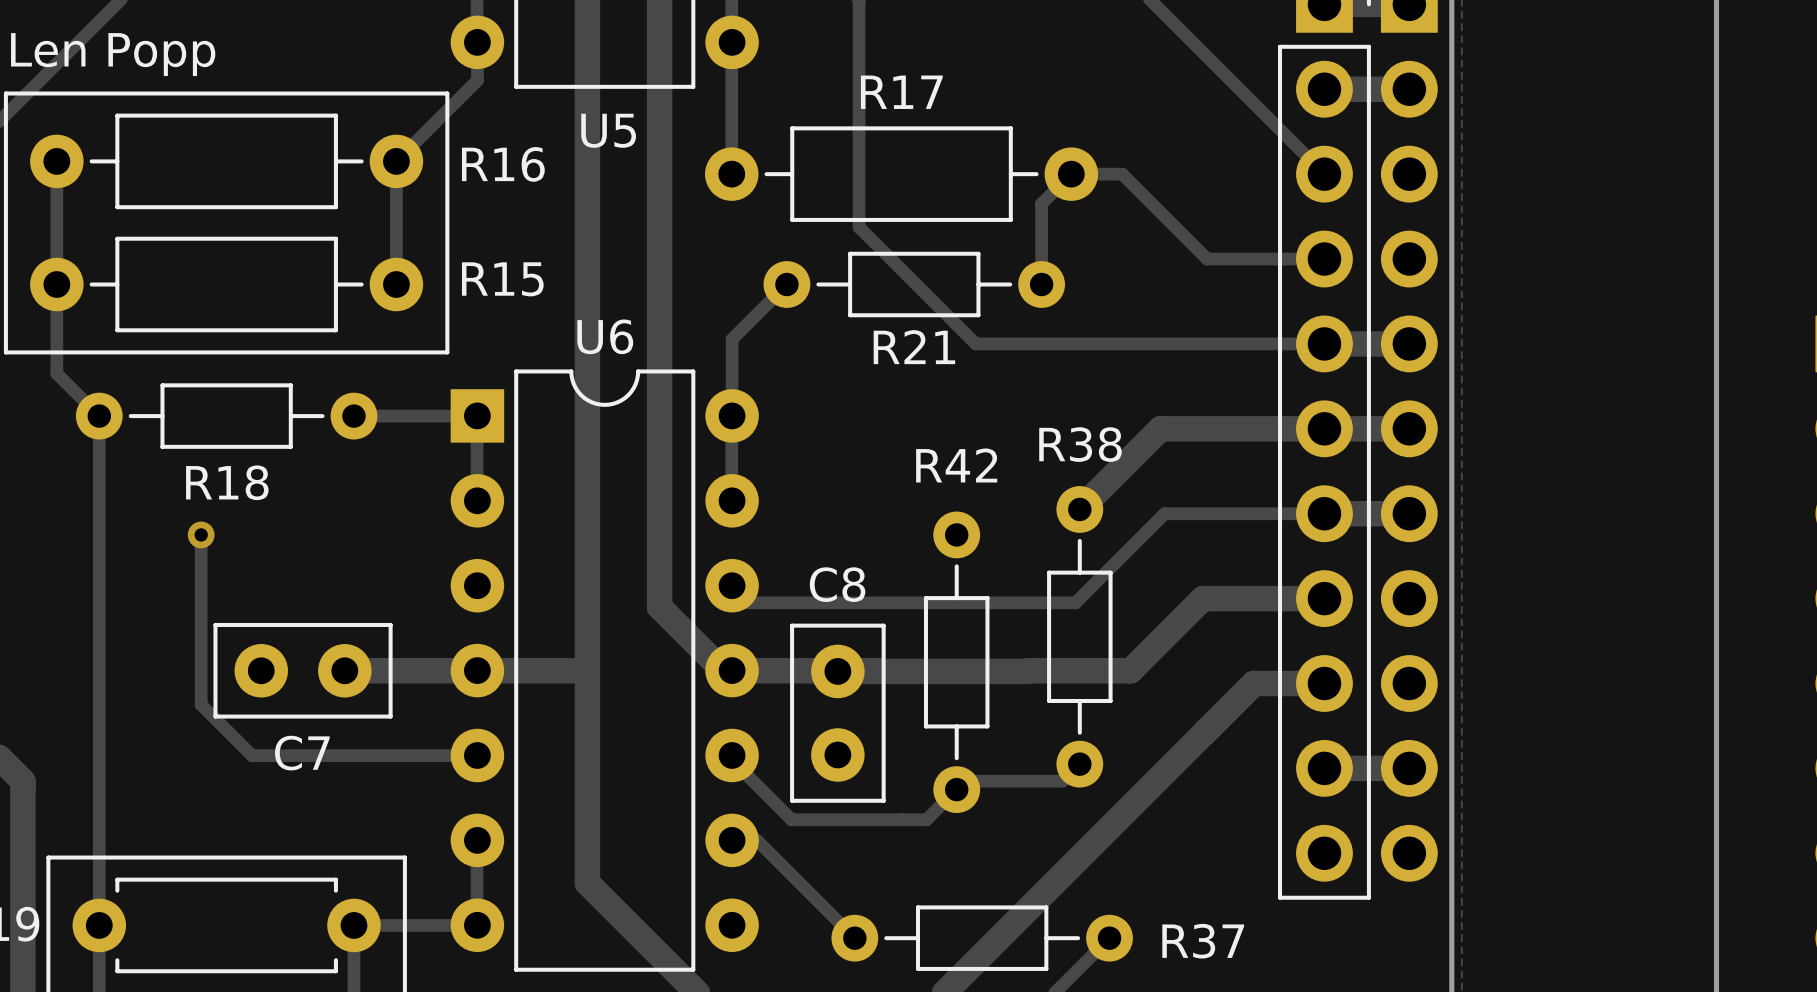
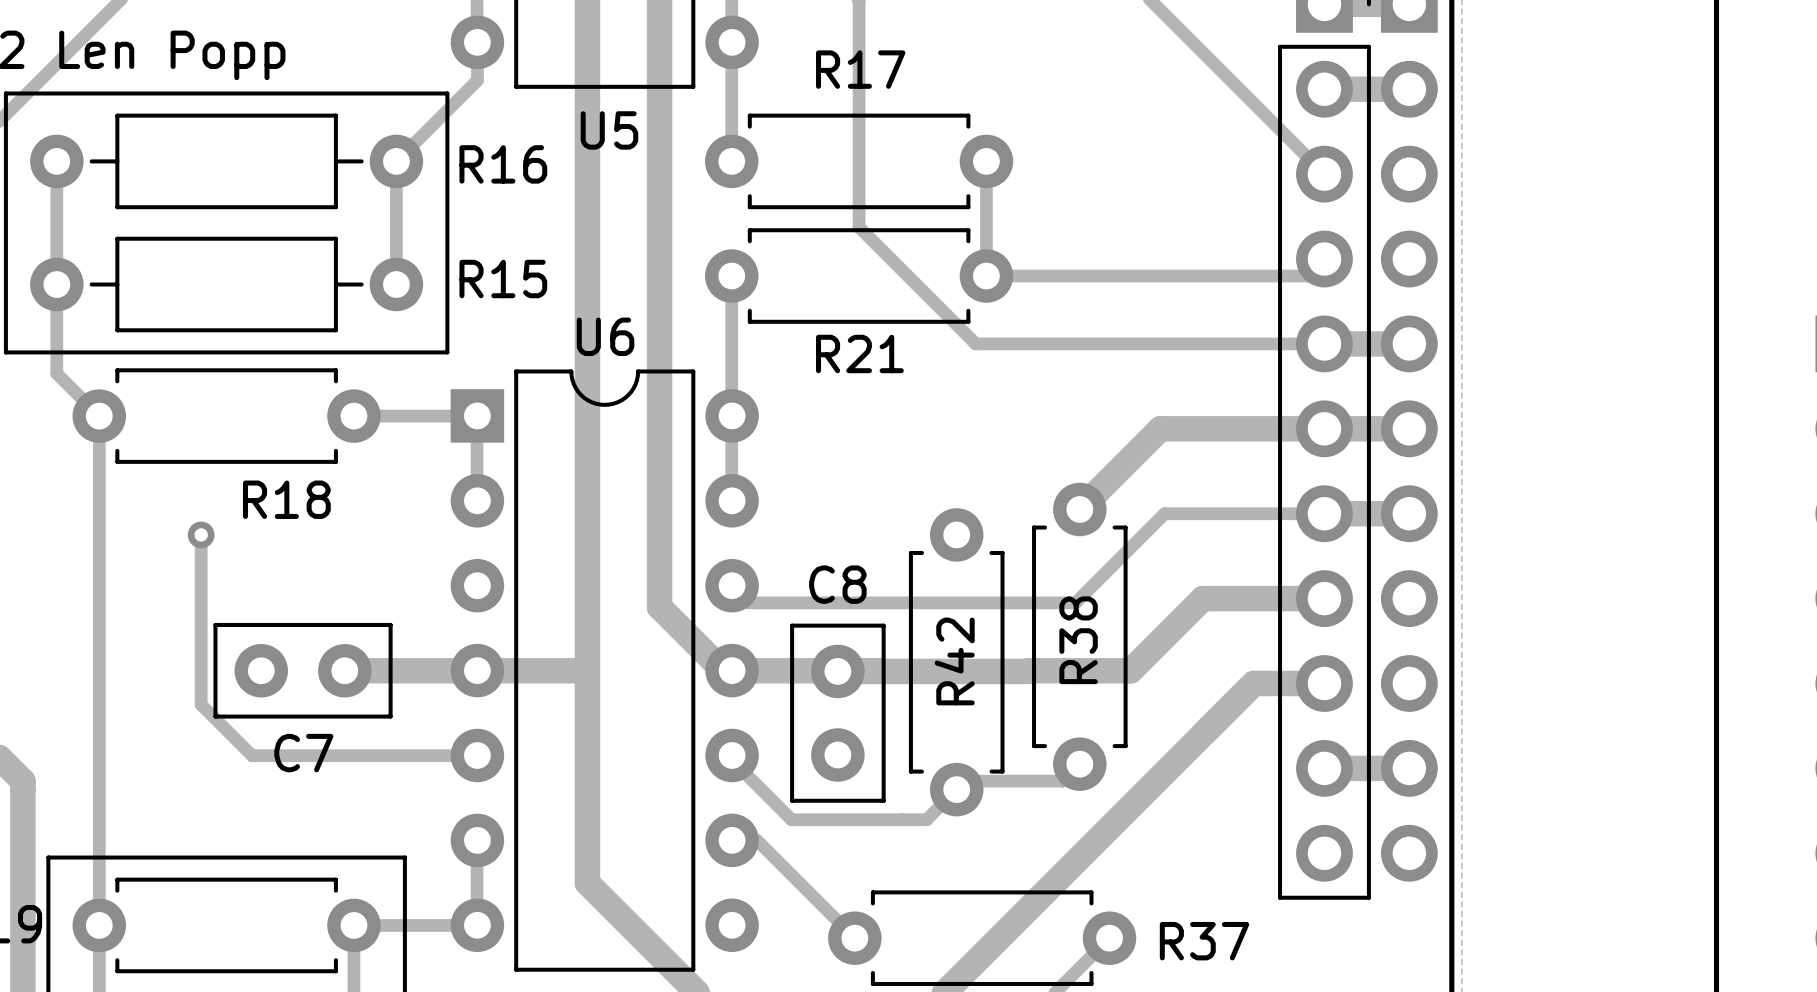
R17 footprint: [705, 126, 1099, 222] -> [705, 113, 1014, 210]
R21 footprint: [763, 251, 1066, 318] -> [705, 228, 1014, 324]
track: (1324, 259) (1207, 259) (1122, 174) (1071, 174) (1041, 203) (1041, 284) -> (1324, 259) (1307, 276) (986, 276) (986, 161)
track: (786, 284) (732, 339) (732, 415) -> (731, 276) (731, 416)
R18 footprint: [75, 383, 378, 449] -> [72, 368, 381, 464]
R38 name position: R38 (1080, 444) -> R38 (1078, 640)
R42 name position: R42 (956, 465) -> R42 (954, 661)
R38 footprint: [1047, 486, 1113, 788] -> [1032, 482, 1128, 791]
R42 footprint: [923, 511, 990, 814] -> [908, 508, 1005, 817]
R37 footprint: [831, 905, 1133, 971] -> [828, 890, 1137, 986]

